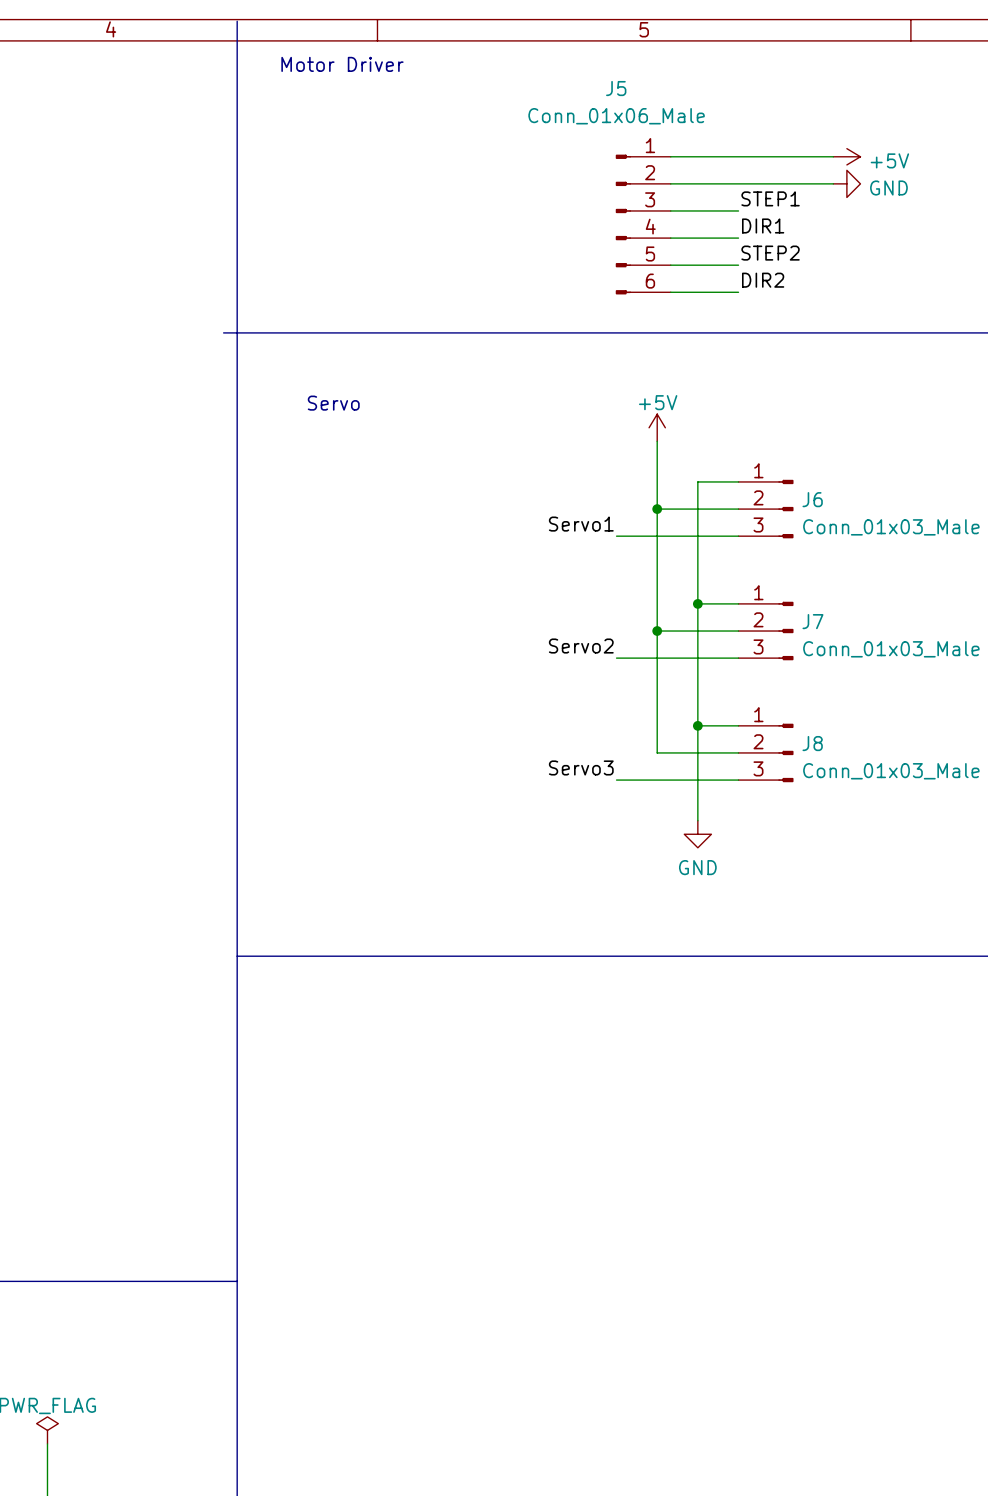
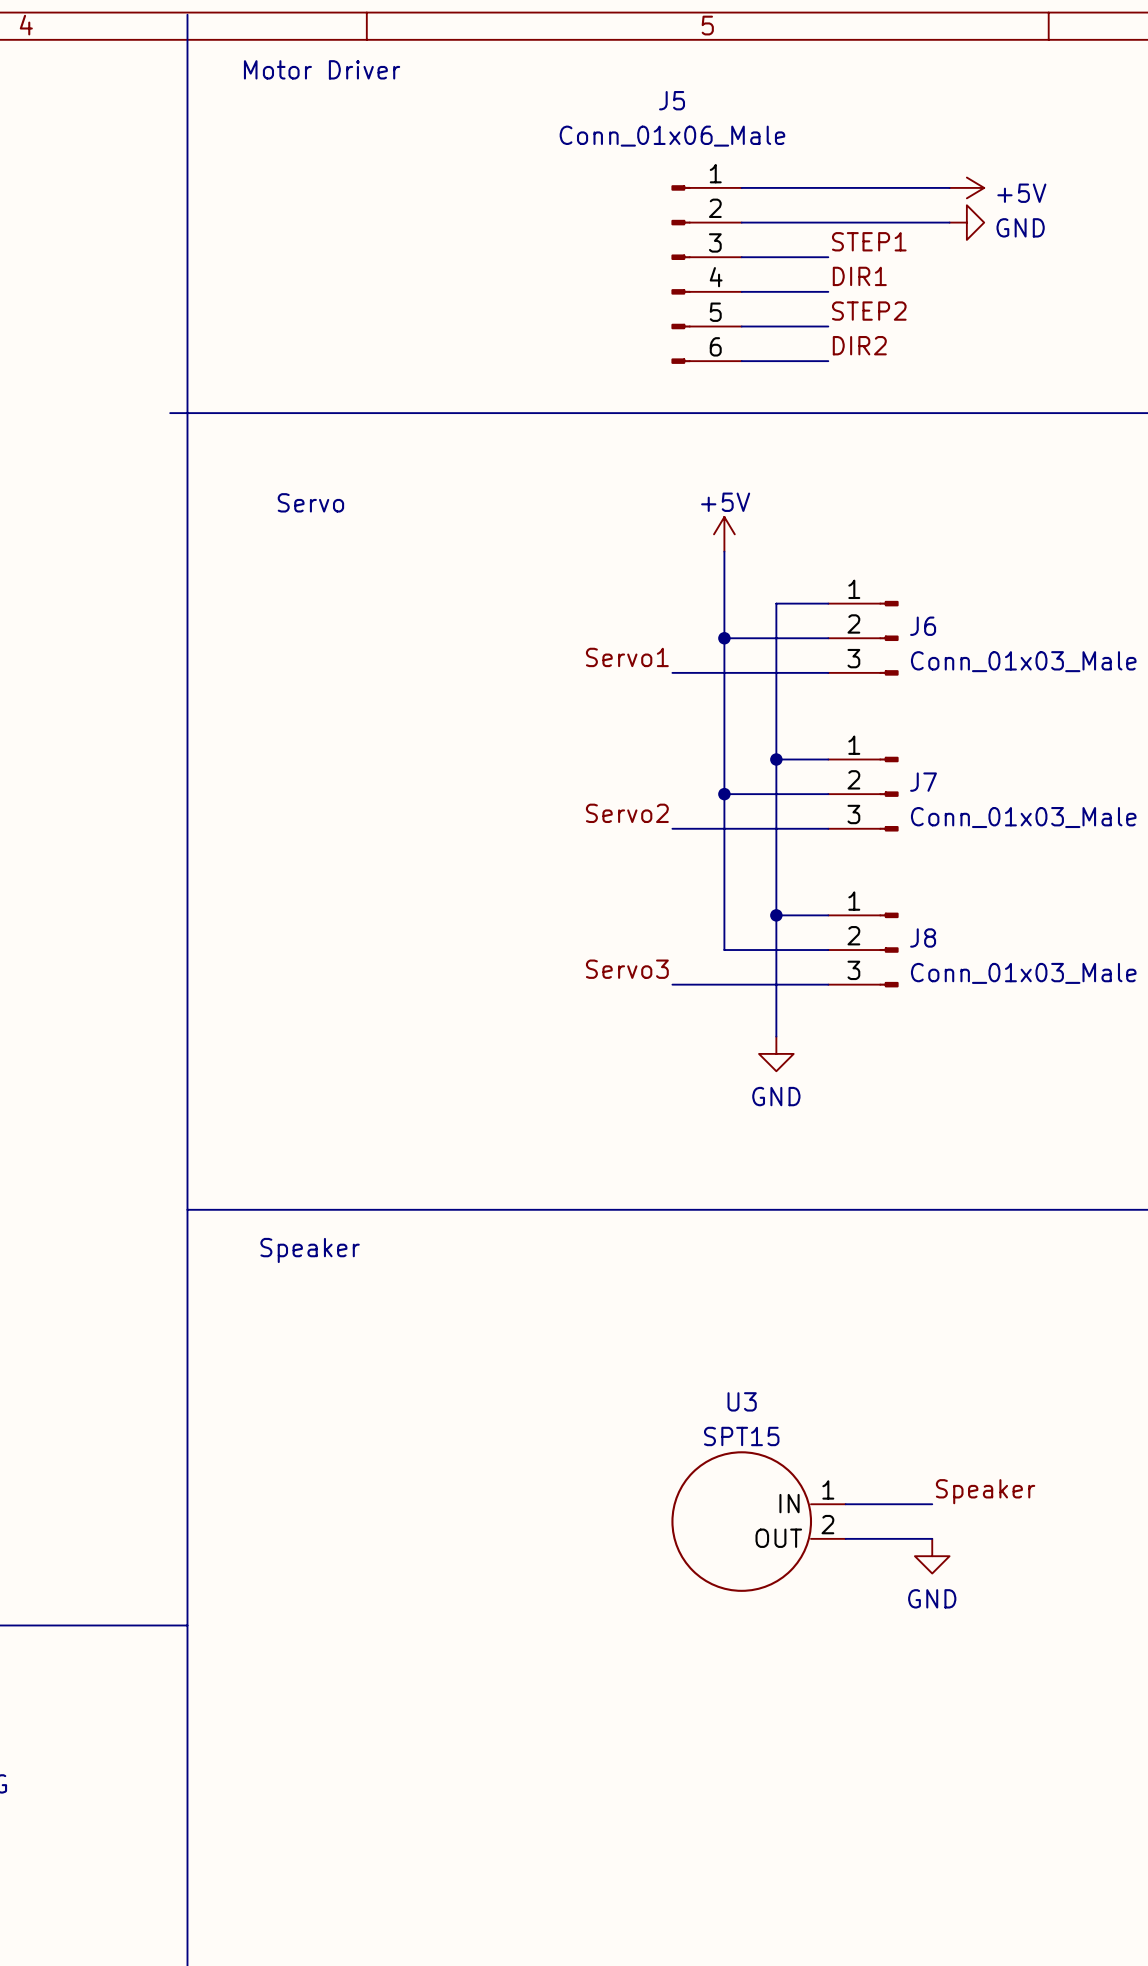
text: none -> Speaker (310, 1250)
label: none -> Speaker (985, 1491)
wire: none -> (845, 1504) (932, 1504)
U3: none -> SPT15 (758, 1521)
wire: none -> (845, 1538) (932, 1538)
power symbol: none -> GND (932, 1556)

